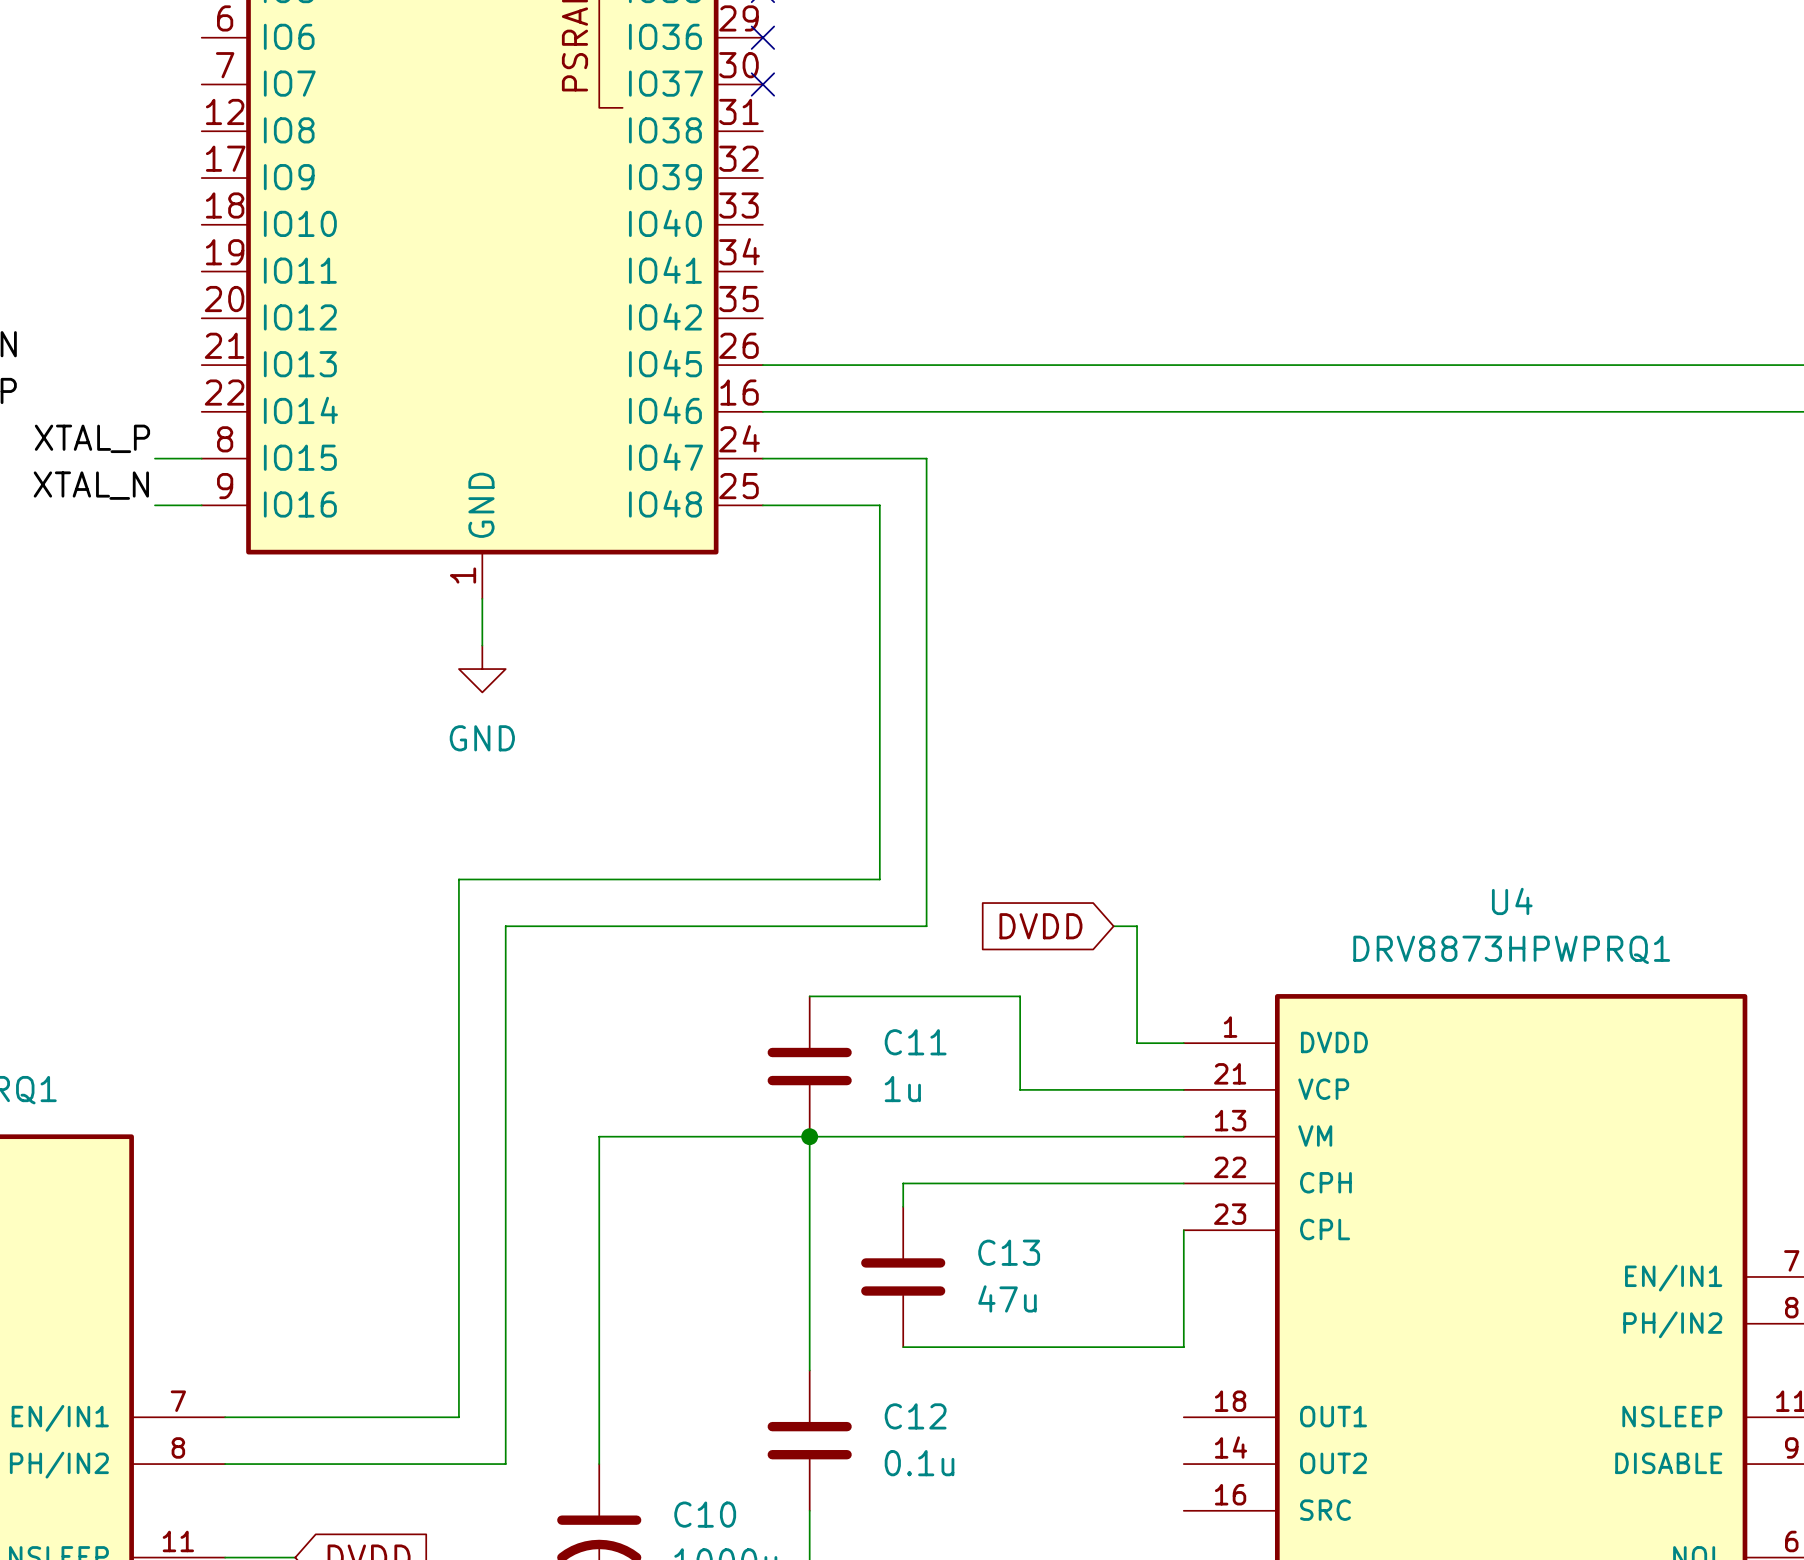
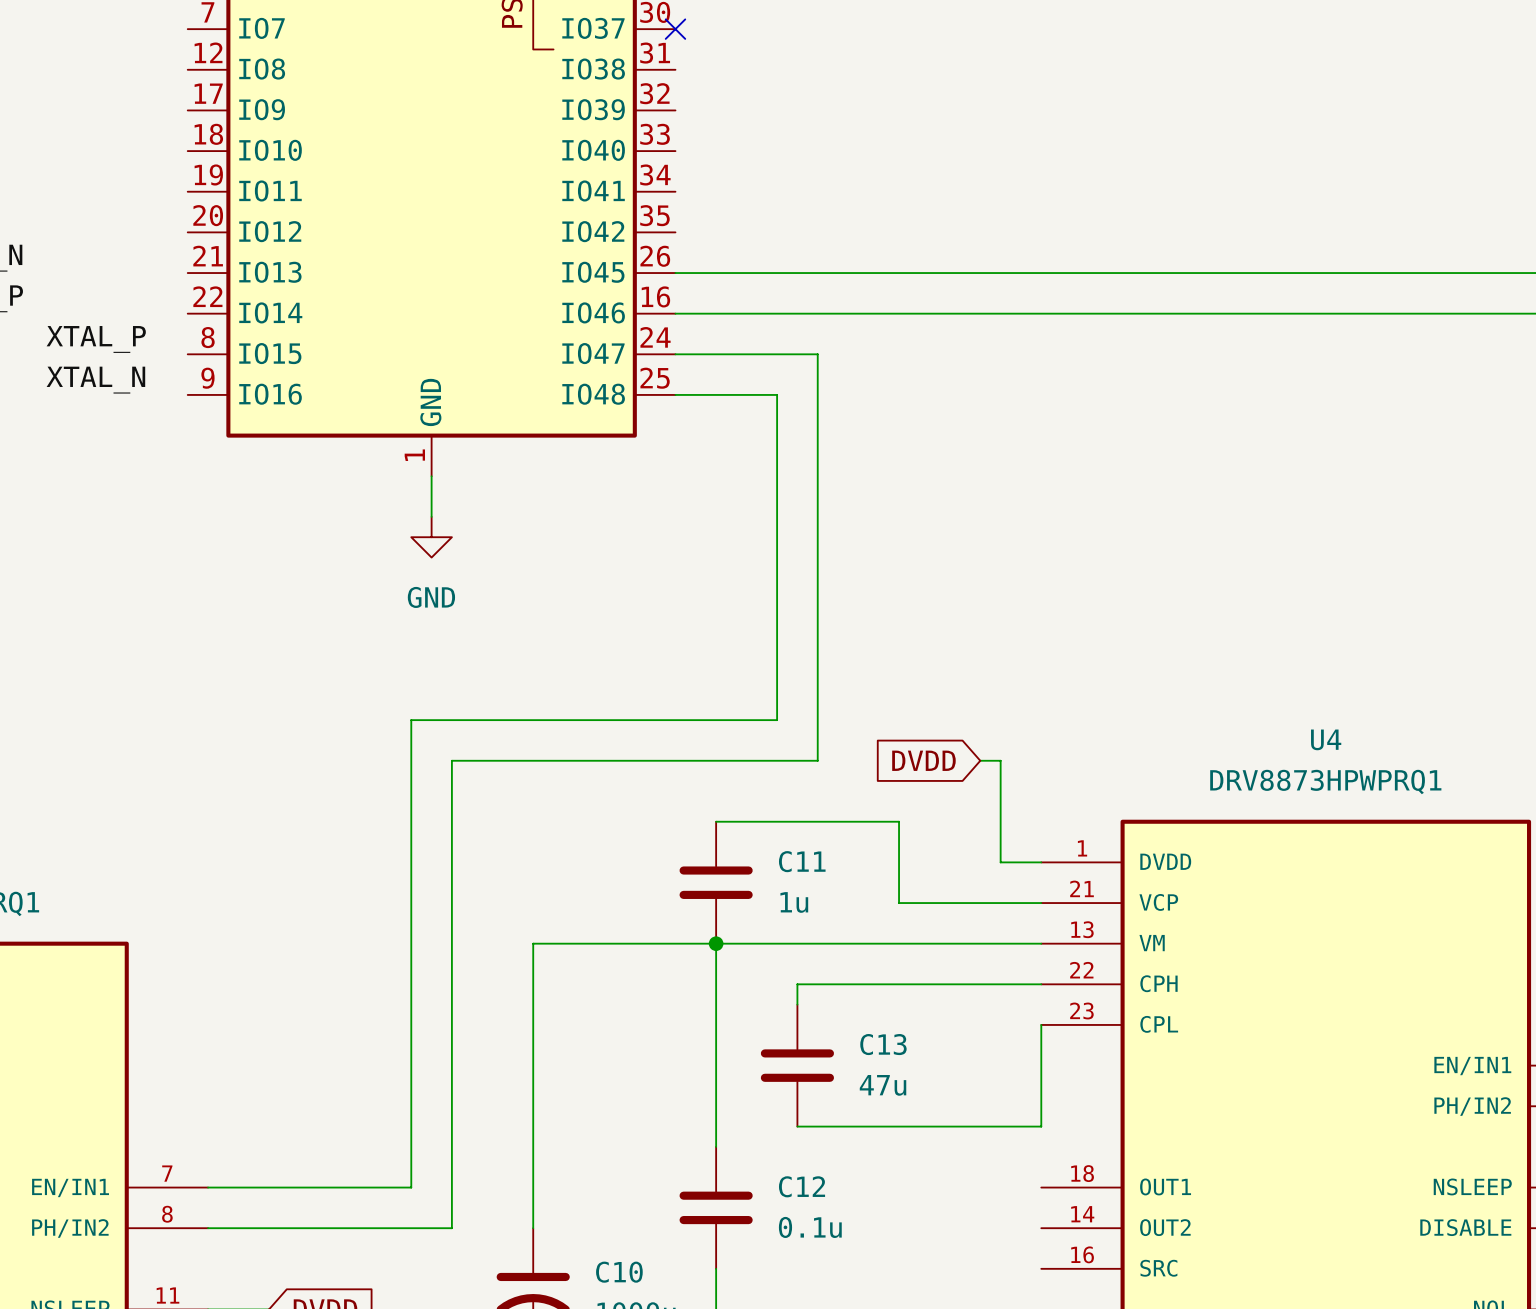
wire: (154, 458) (201, 458) -> none
wire: (154, 505) (201, 505) -> none

